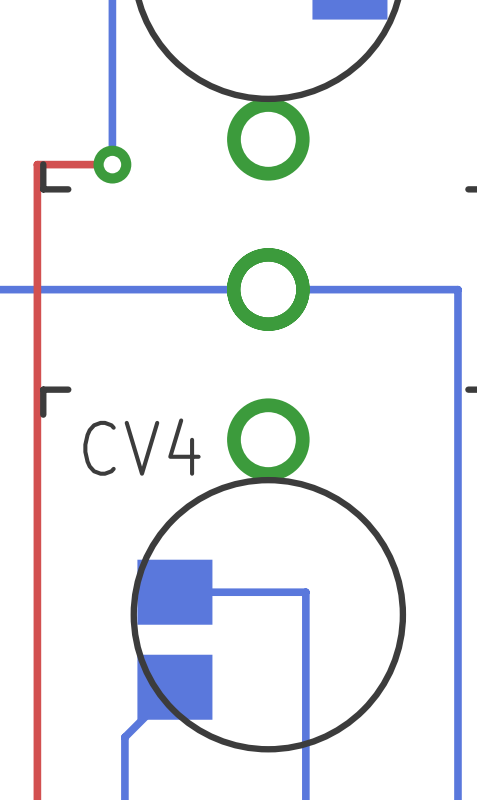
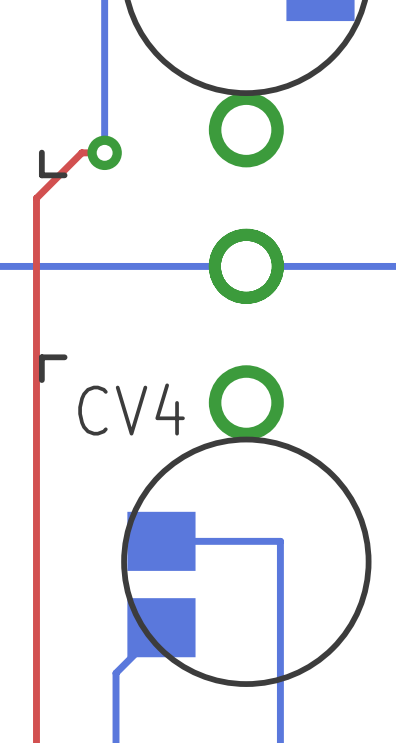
top track: (87, 164) (37, 164) (37, 214) -> (81, 152) (36, 198)

